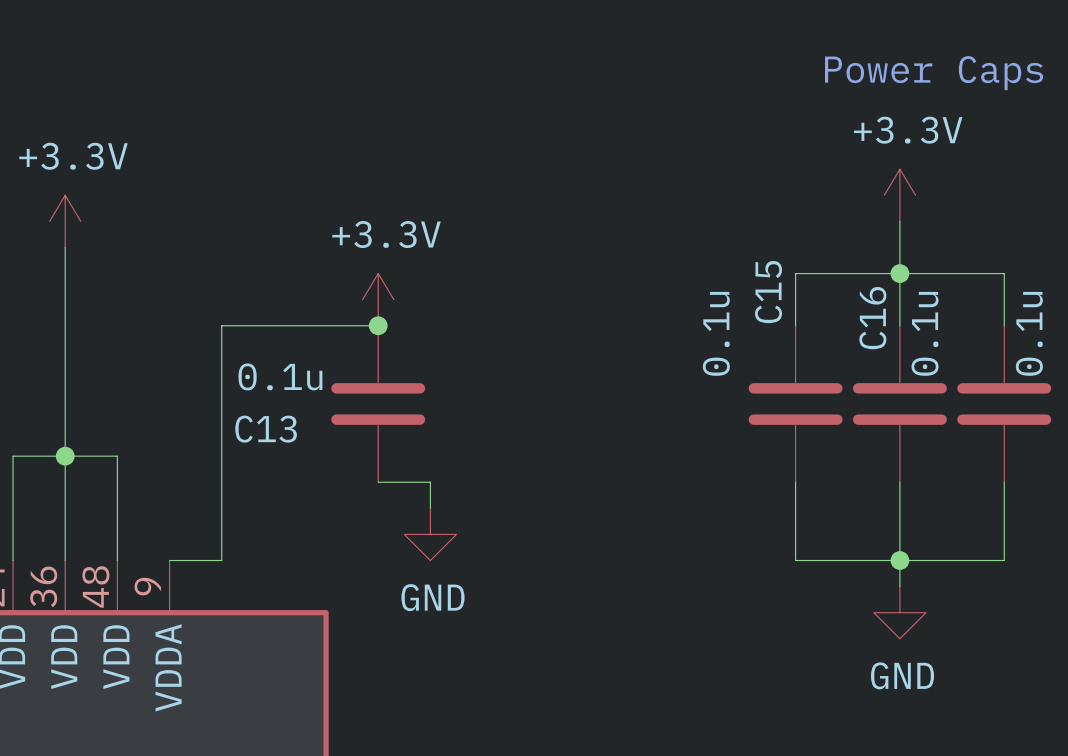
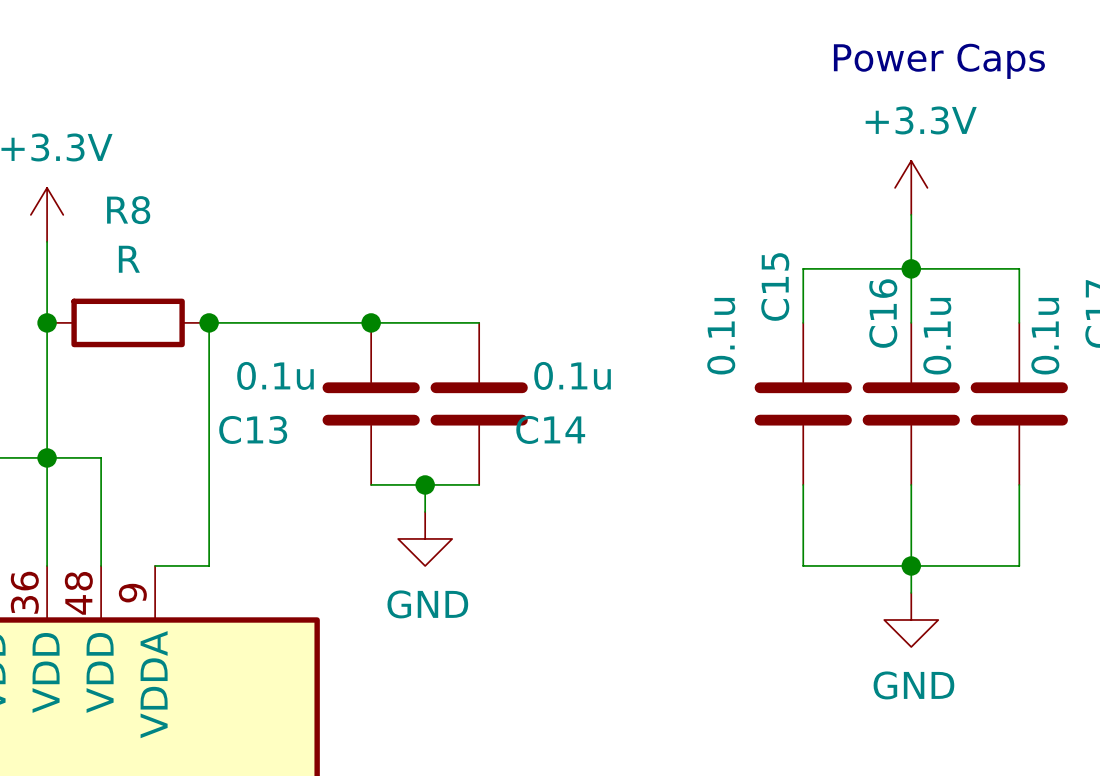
power symbol: +3.3V (378, 299) -> none
junction: none -> (47, 322)
R8: none -> R (128, 322)
junction: none -> (209, 322)
wire: none -> (371, 322) (479, 322)
C14: none -> 0.1u (479, 403)
wire: none -> (425, 484) (479, 484)
junction: none -> (425, 484)

